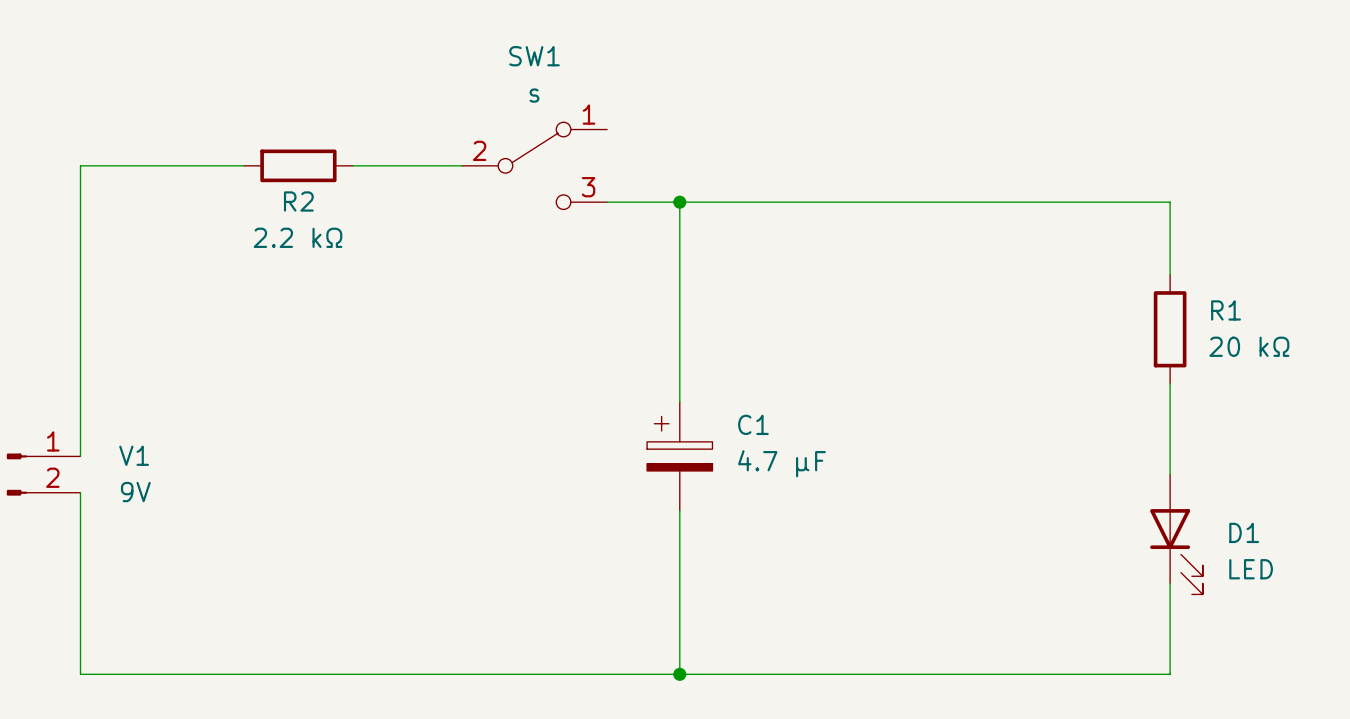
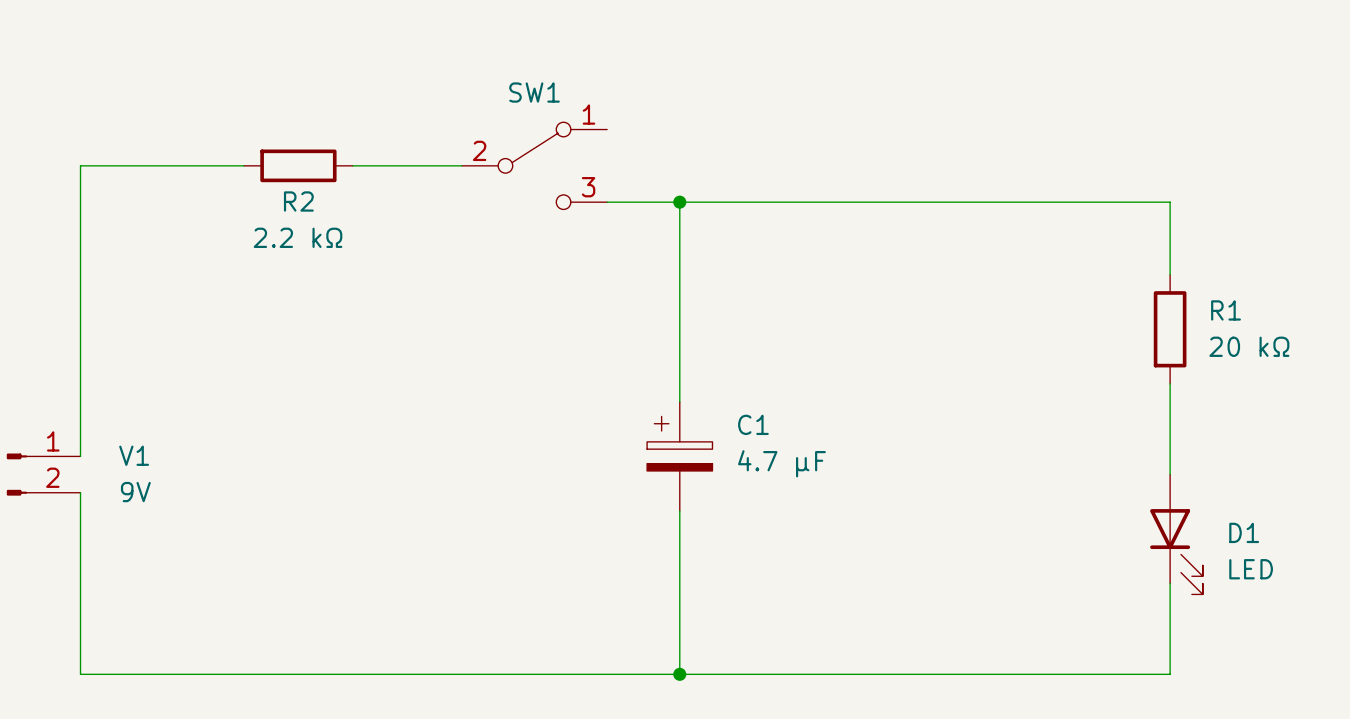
SW1 name position: SW1 (534, 56) -> SW1 (534, 92)
SW1 value: s (534, 95) -> none

